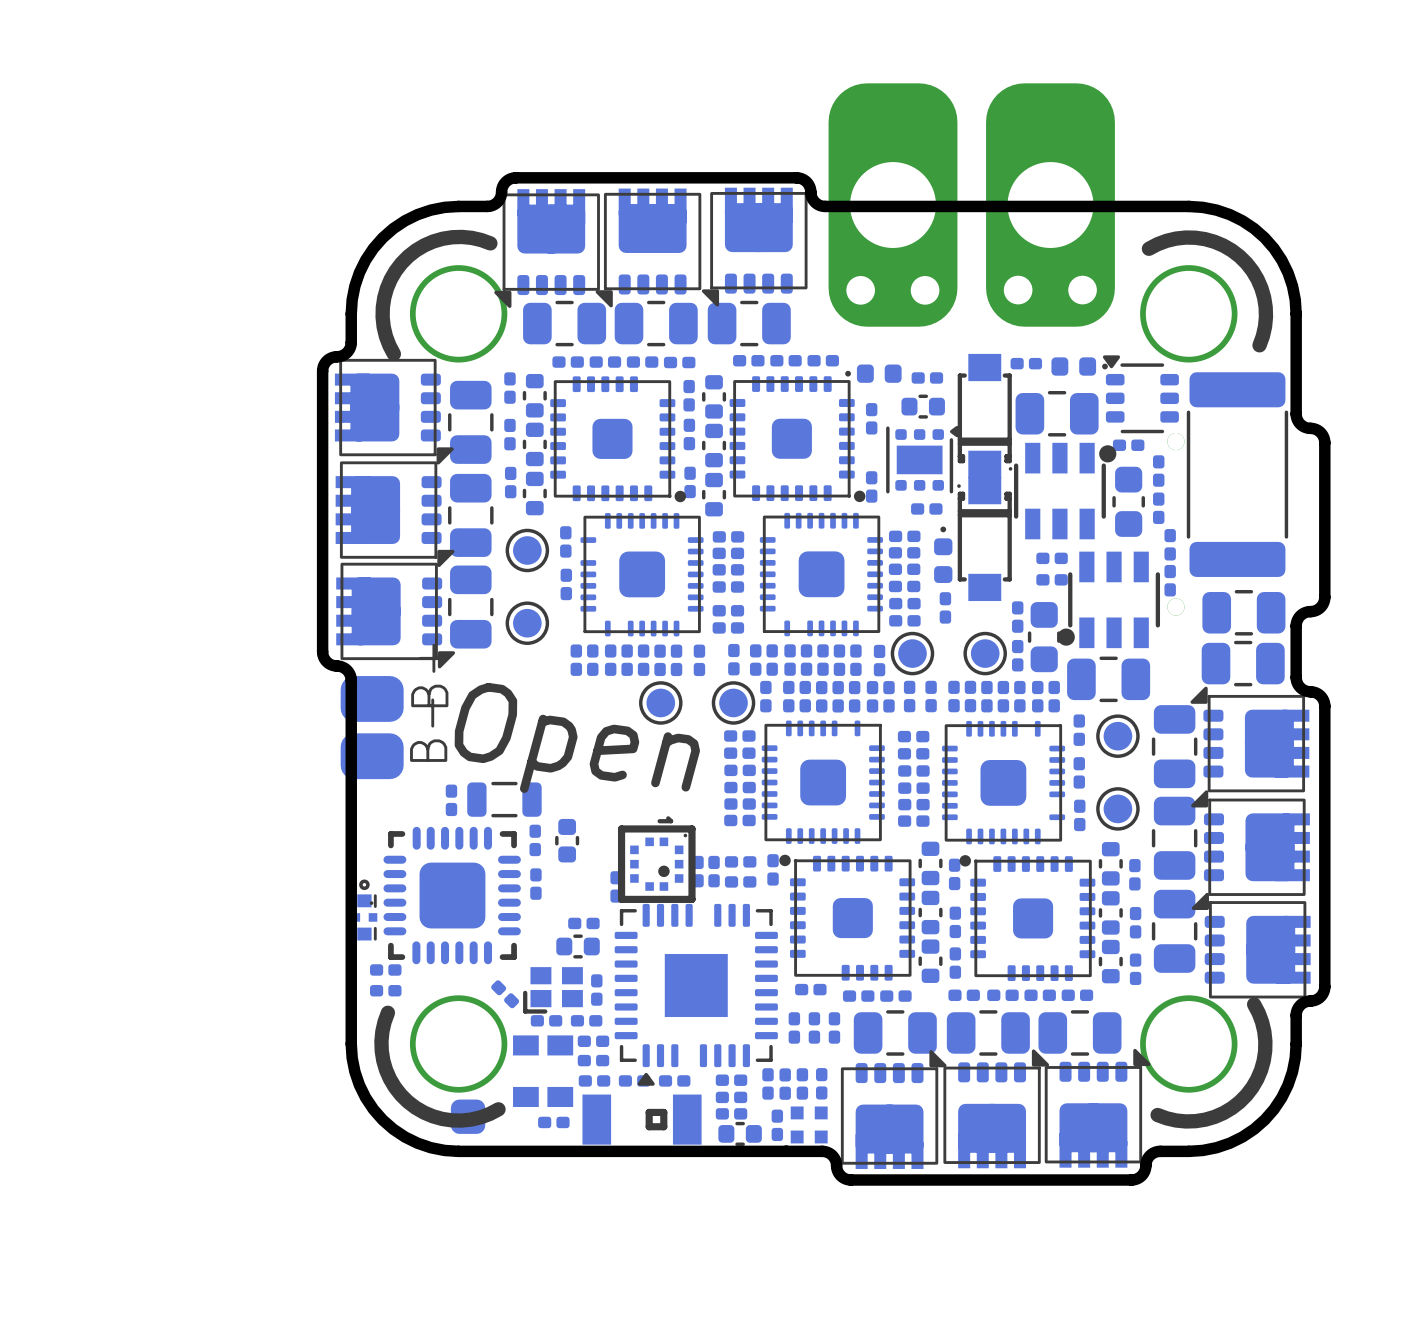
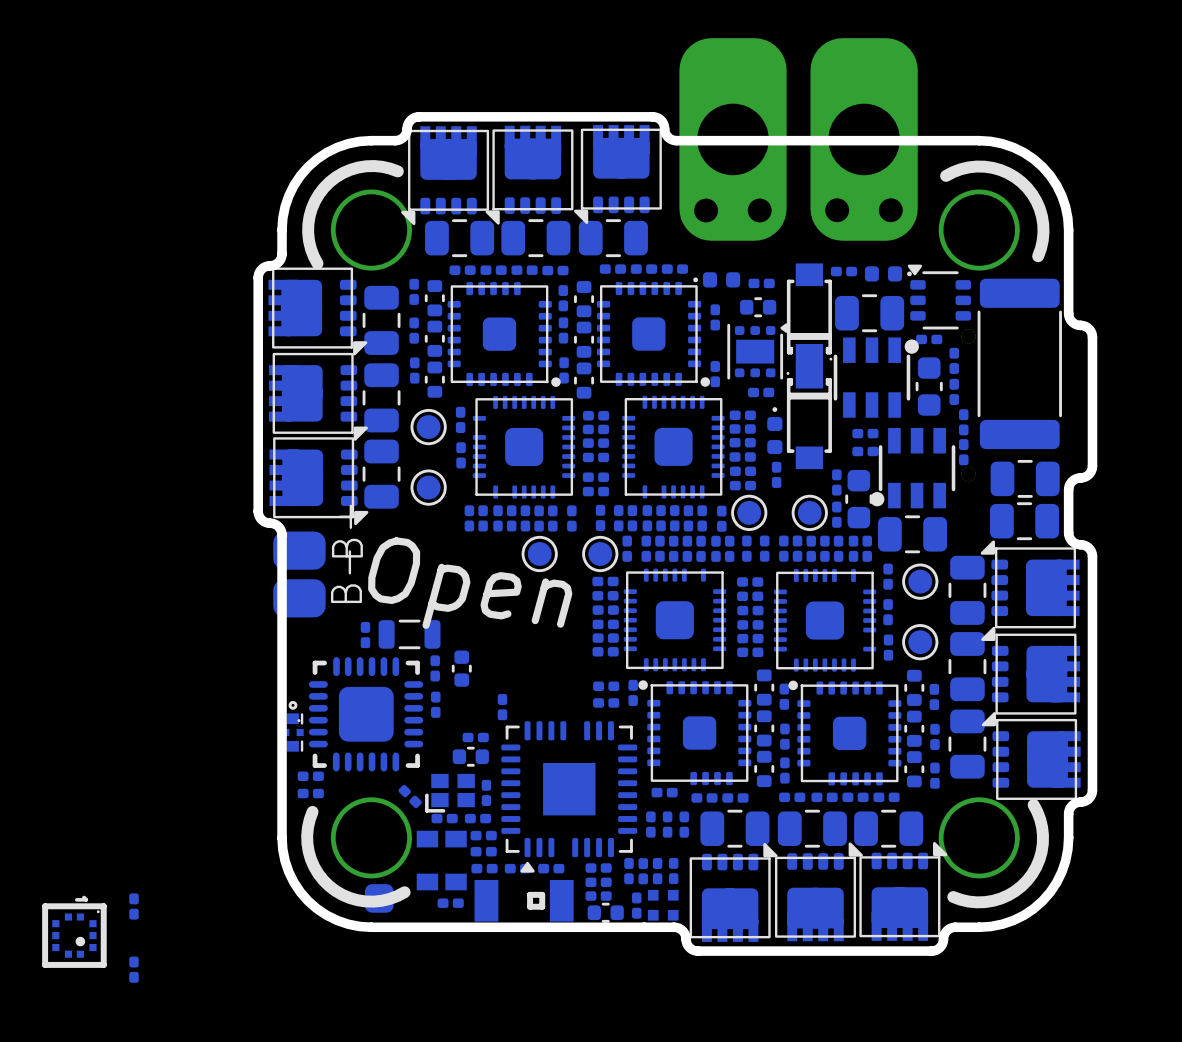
part position: (656, 859) -> (74, 931)
part: (698, 871) -> none
part: (714, 871) -> none
part: none -> (134, 906)
part: none -> (134, 969)

